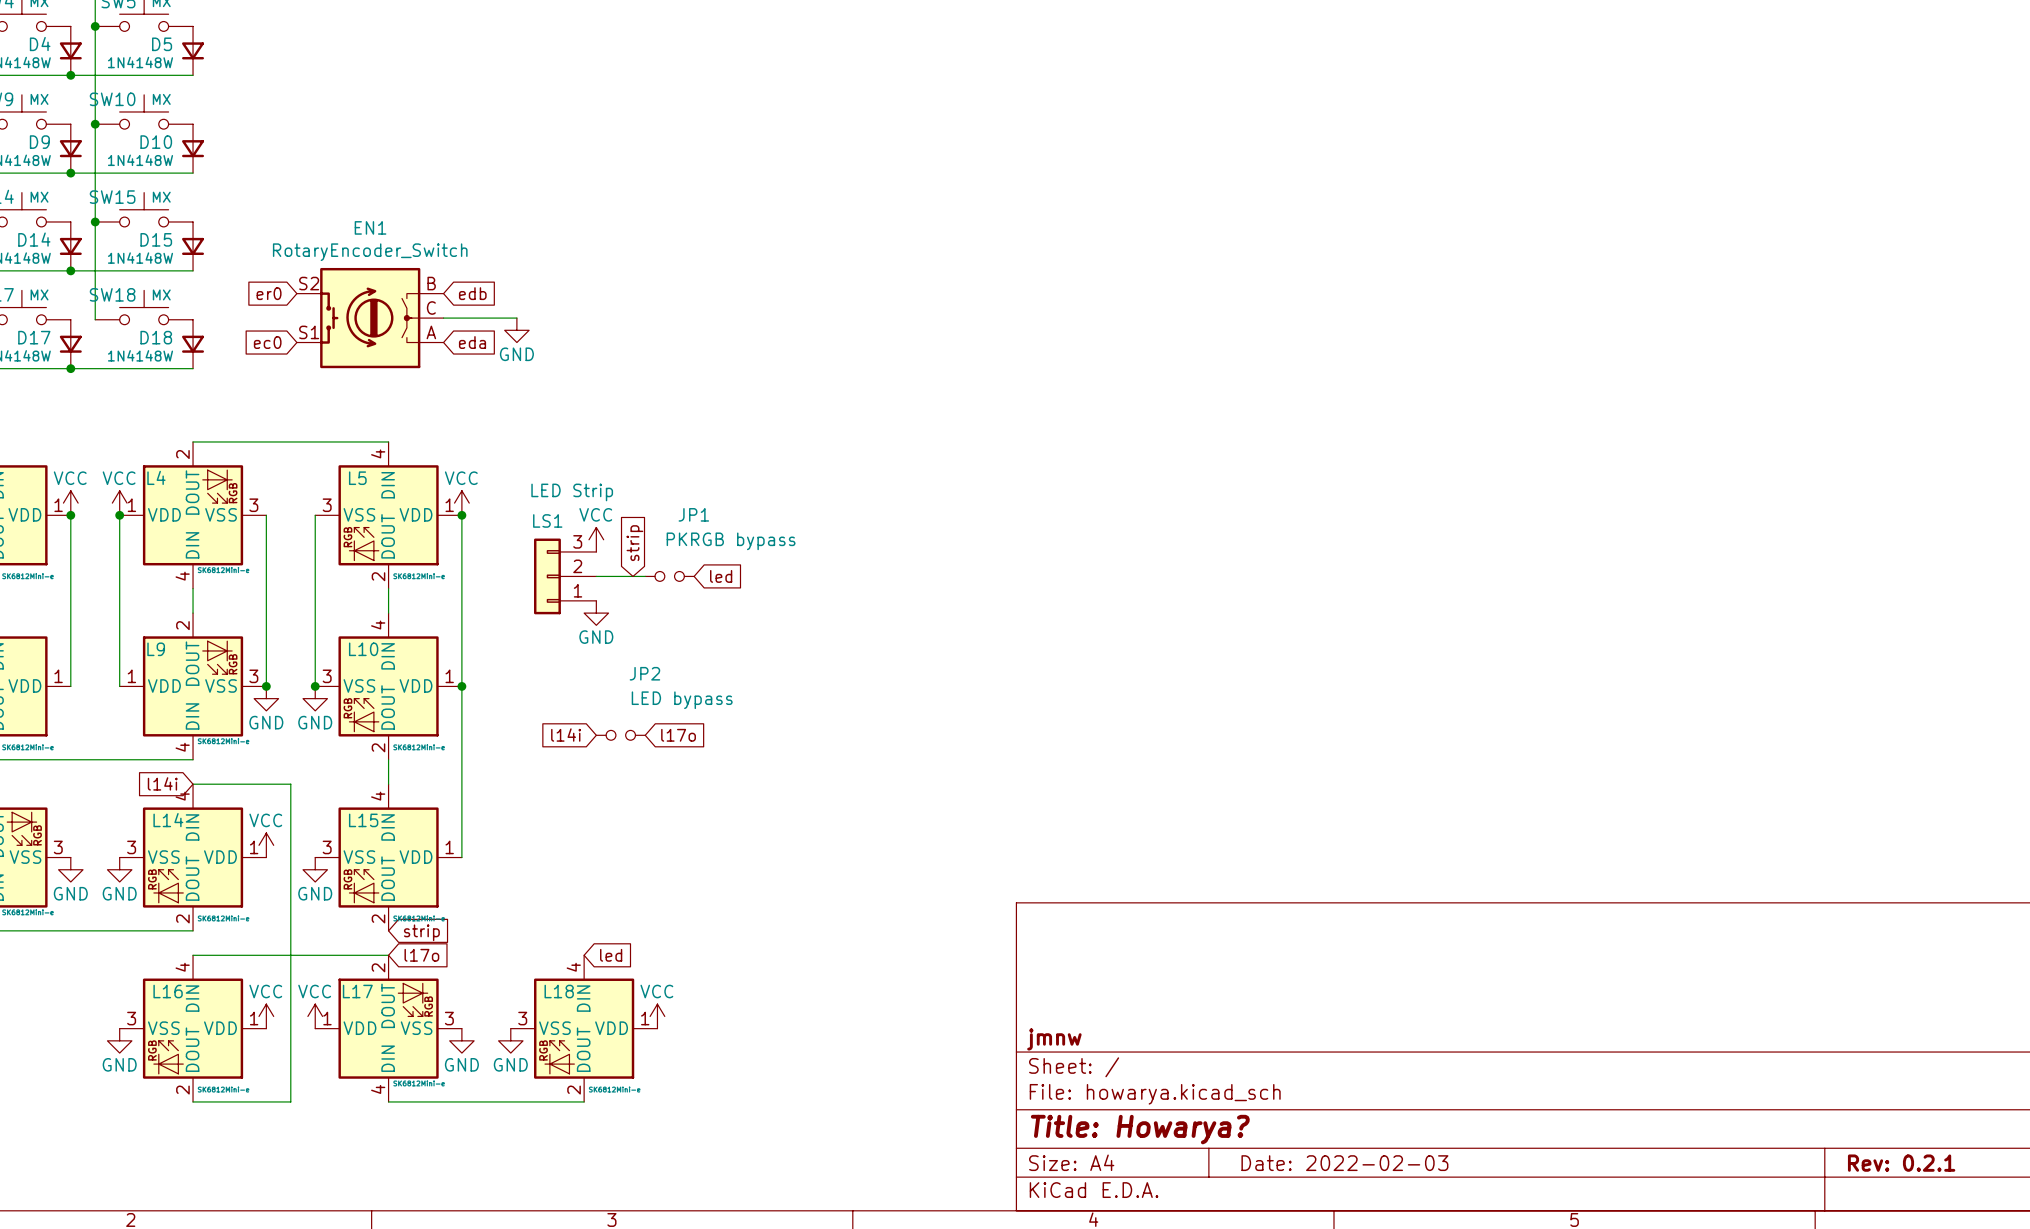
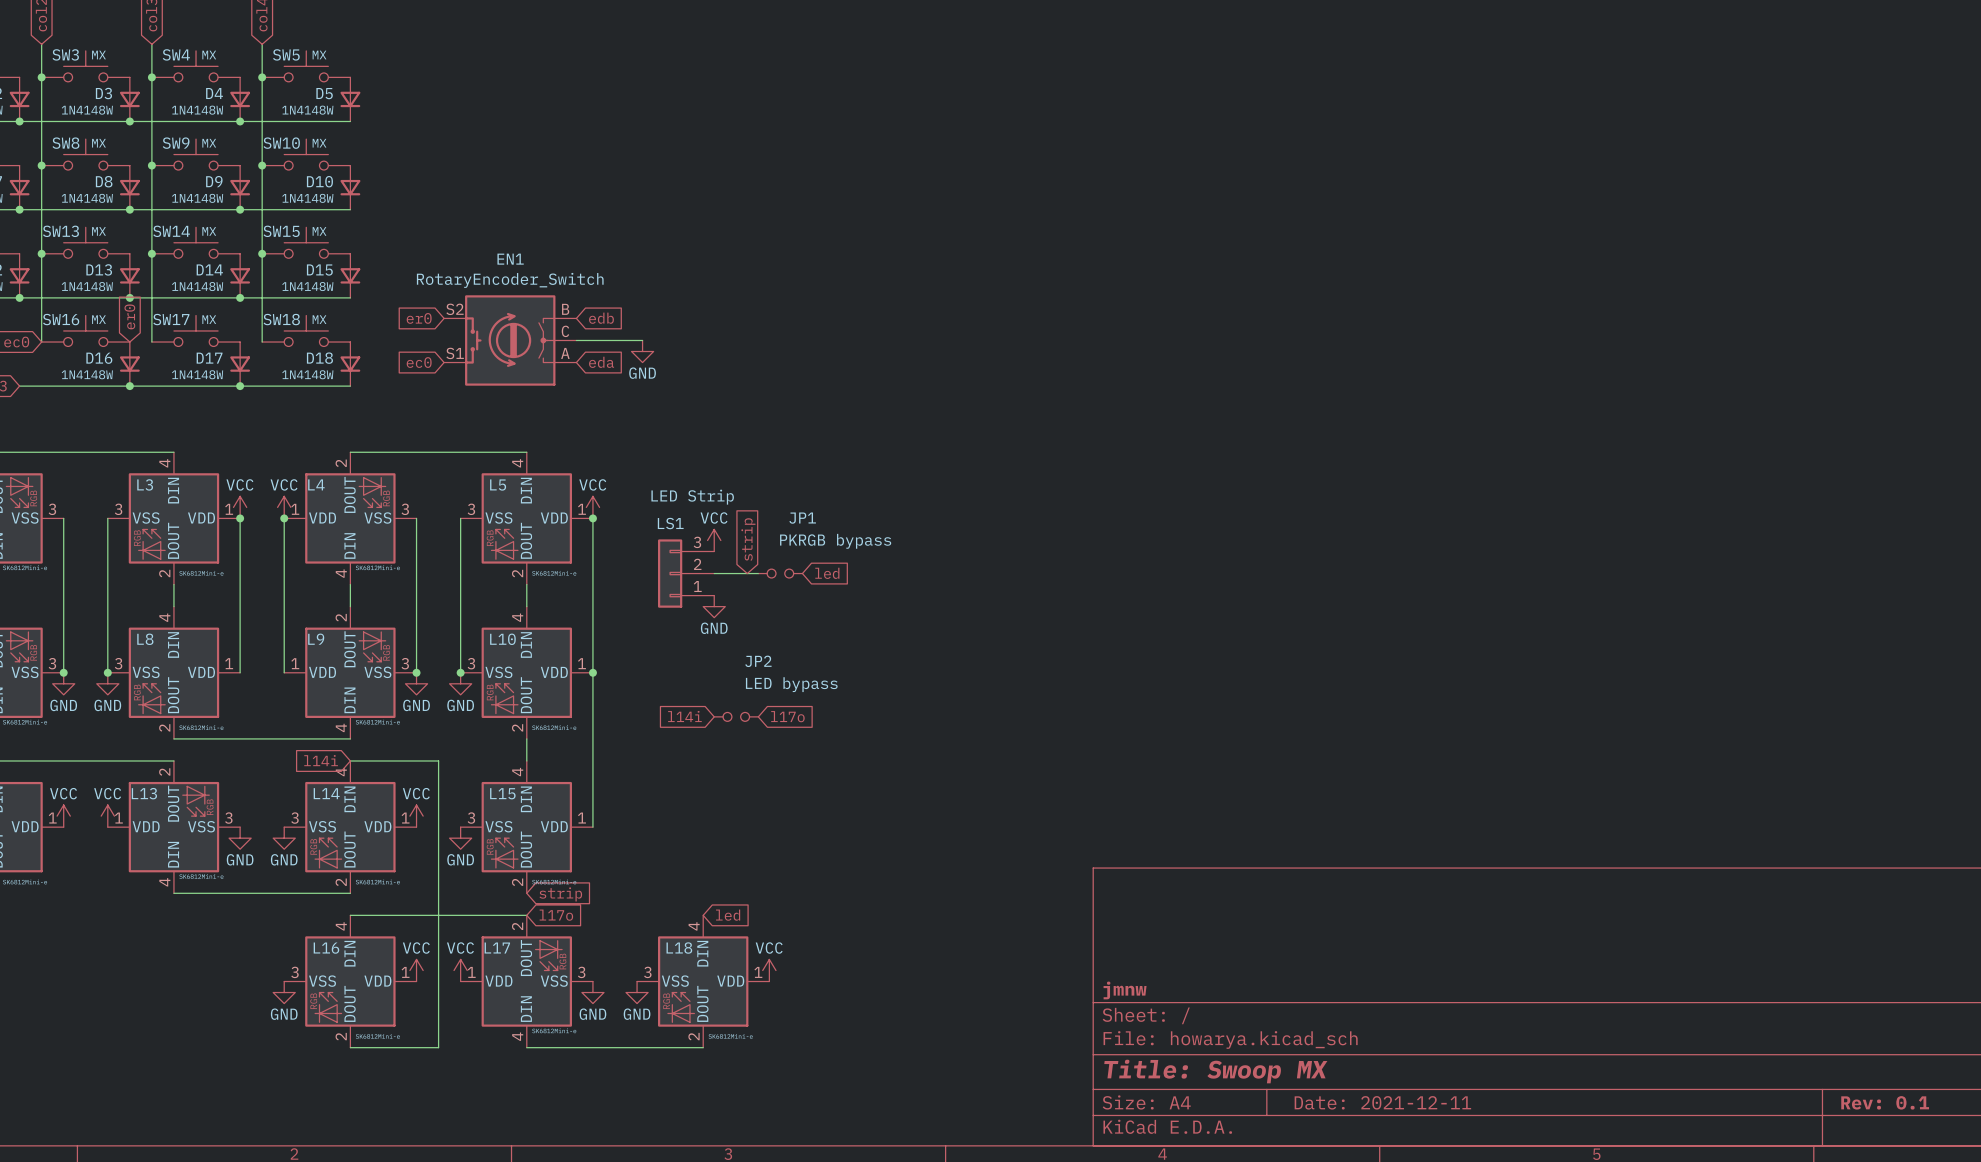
title block: Title: Howarya? (1140, 1129) -> Title: Swoop MX (1215, 1071)
title block: Date: 2022-02-03 (1344, 1163) -> Date: 2021-12-11 (1382, 1102)
title block: Rev: 0.2.1 (1901, 1163) -> Rev: 0.1 (1885, 1102)

